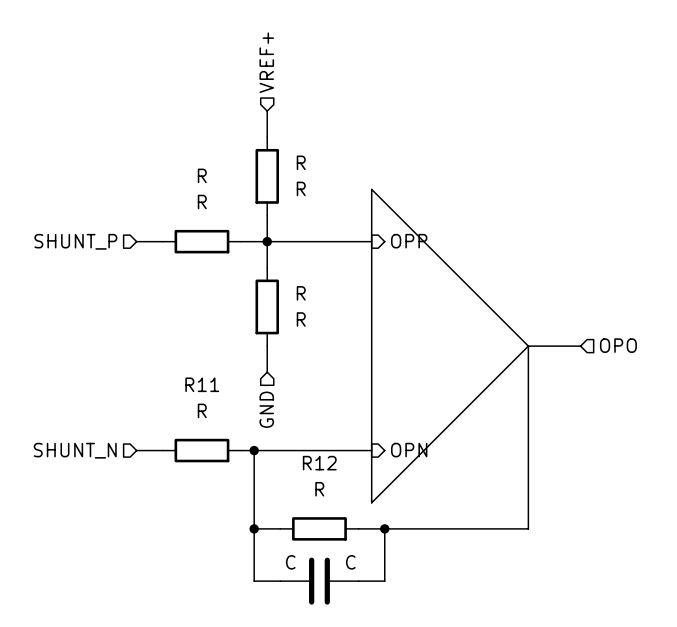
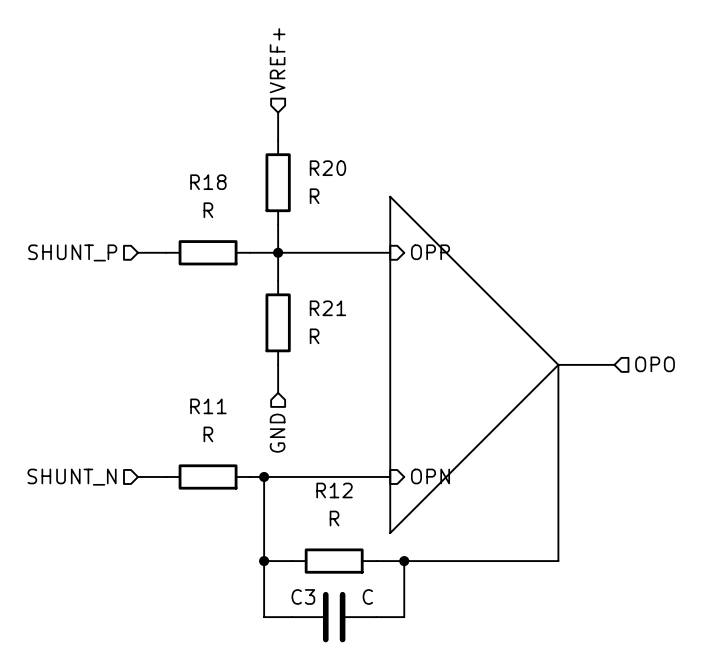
R name: R (301, 162) -> R20 (327, 168)
R name: R (202, 175) -> R18 (208, 182)
R name: R (301, 293) -> R21 (327, 308)
C name: C (290, 562) -> C3 (303, 596)

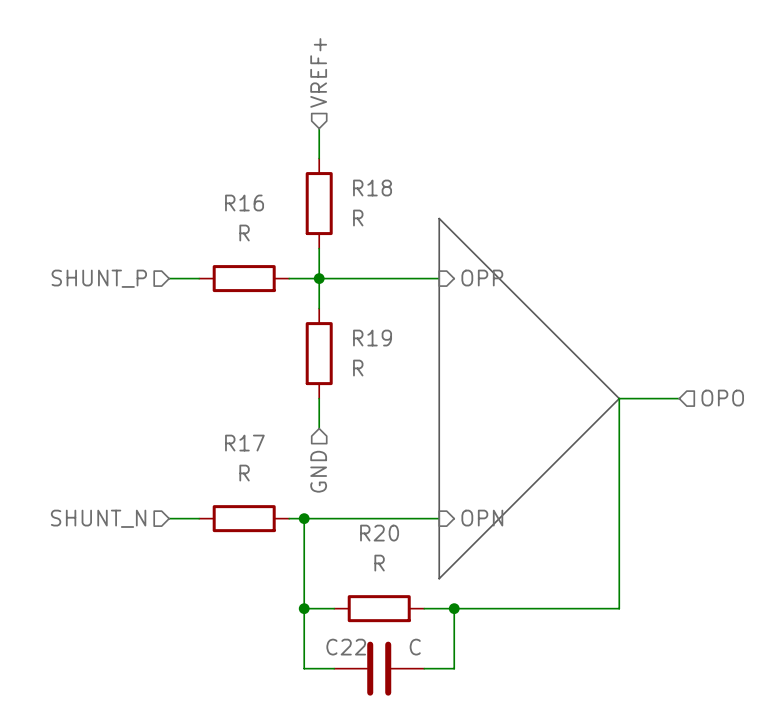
R20 name: R20 (327, 168) -> R18 (372, 188)
R18 name: R18 (208, 182) -> R16 (244, 203)
R21 name: R21 (327, 308) -> R19 (372, 338)
R11 name: R11 (208, 406) -> R17 (244, 443)
R12 name: R12 (334, 490) -> R20 (379, 533)
C3 name: C3 (303, 596) -> C22 (346, 647)

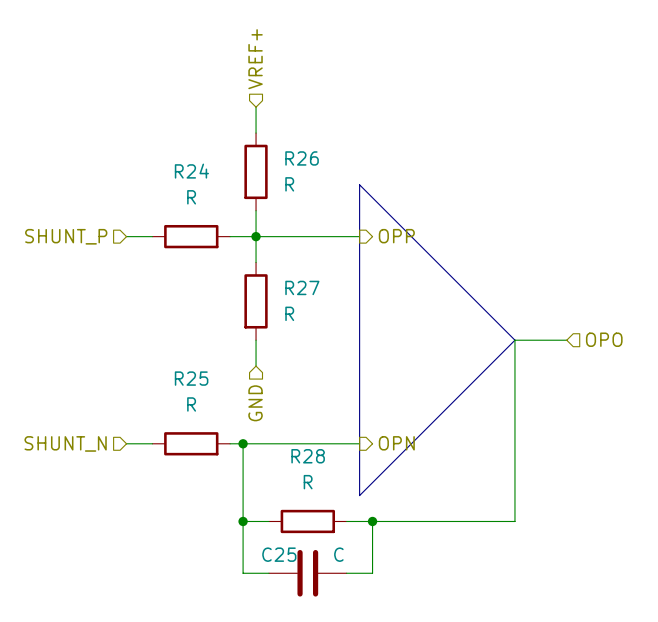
R18 name: R18 (372, 188) -> R26 (302, 158)
R16 name: R16 (244, 203) -> R24 (191, 171)
R19 name: R19 (372, 338) -> R27 (302, 287)
R17 name: R17 (244, 443) -> R25 (191, 378)
R20 name: R20 (379, 533) -> R28 (308, 456)
C22 name: C22 (346, 647) -> C25 (279, 554)

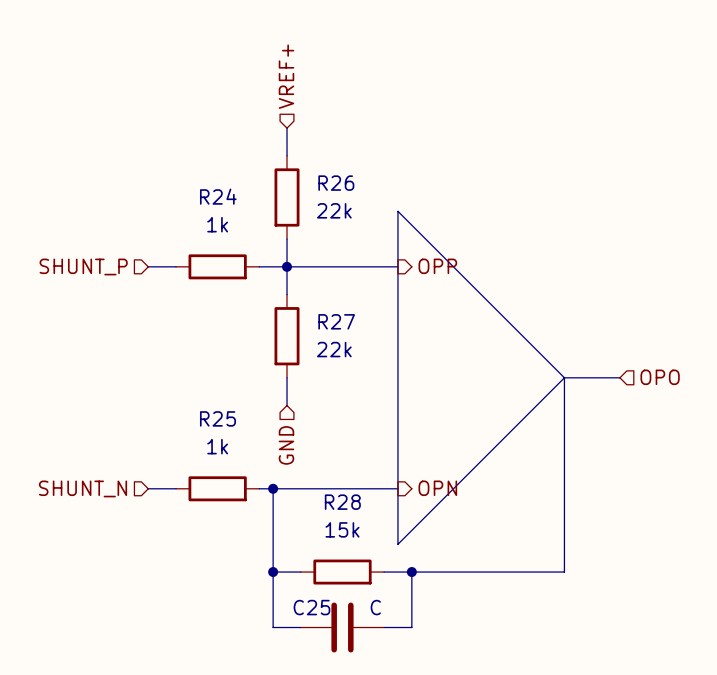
R26 value: R (289, 184) -> 22k (334, 210)
R24 value: R (191, 197) -> 1k (217, 224)
R27 value: R (289, 313) -> 22k (334, 349)
R25 value: R (191, 404) -> 1k (217, 446)
R28 value: R (308, 482) -> 15k (342, 529)

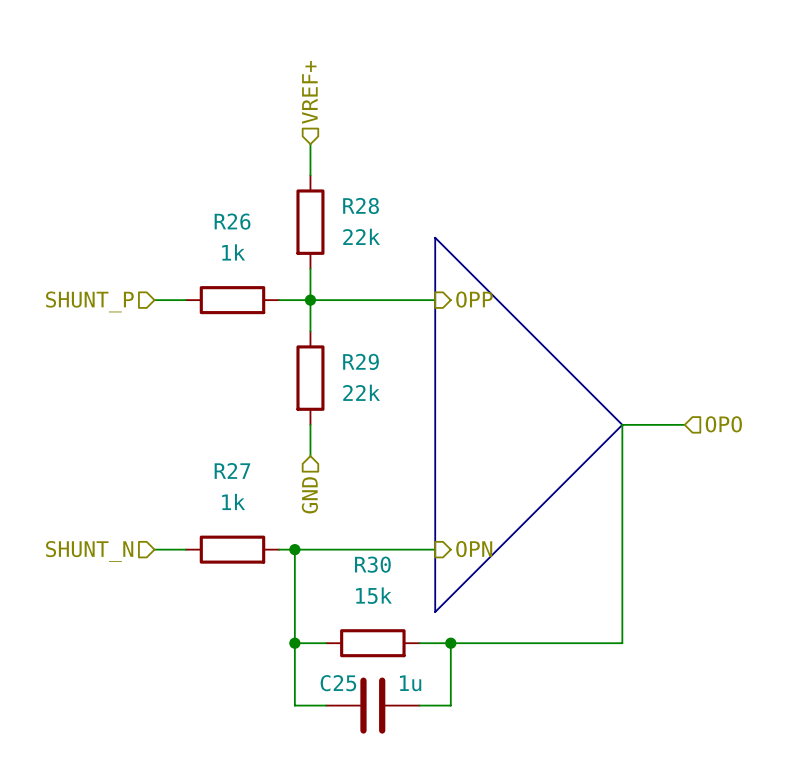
R26 name: R26 (336, 183) -> R28 (361, 205)
R24 name: R24 (218, 196) -> R26 (232, 221)
R27 name: R27 (336, 321) -> R29 (360, 361)
R25 name: R25 (217, 418) -> R27 (232, 470)
R28 name: R28 (342, 502) -> R30 (372, 564)
C25 value: C (375, 607) -> 1u (410, 683)

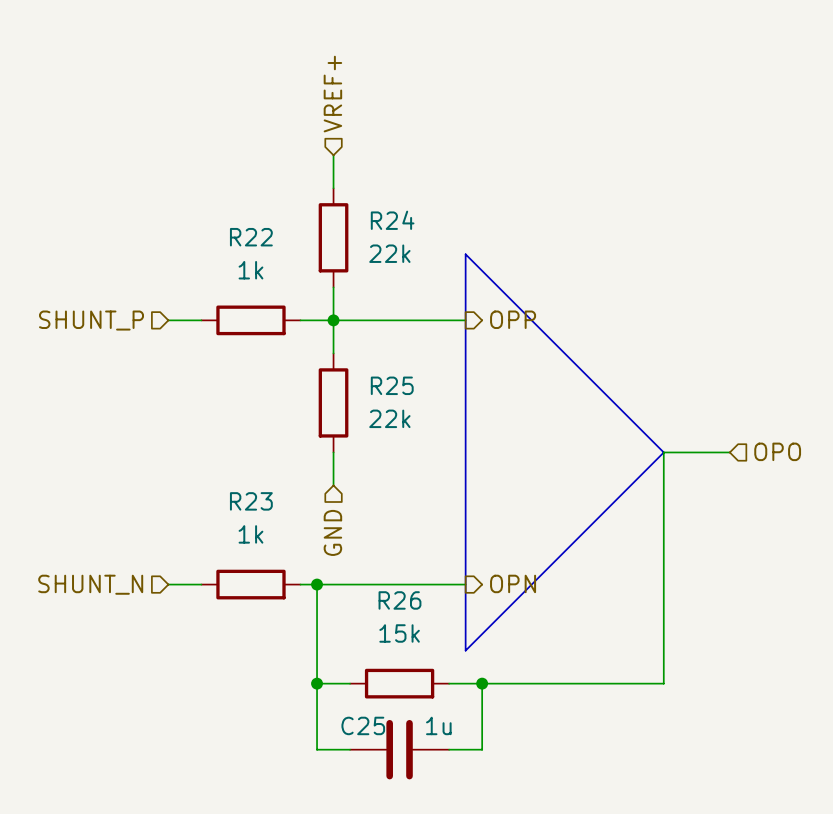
R28 name: R28 (361, 205) -> R24 (392, 220)
R26 name: R26 (232, 221) -> R22 (251, 237)
R29 name: R29 (360, 361) -> R25 (392, 385)
R27 name: R27 (232, 470) -> R23 (251, 501)
R30 name: R30 (372, 564) -> R26 (399, 600)

